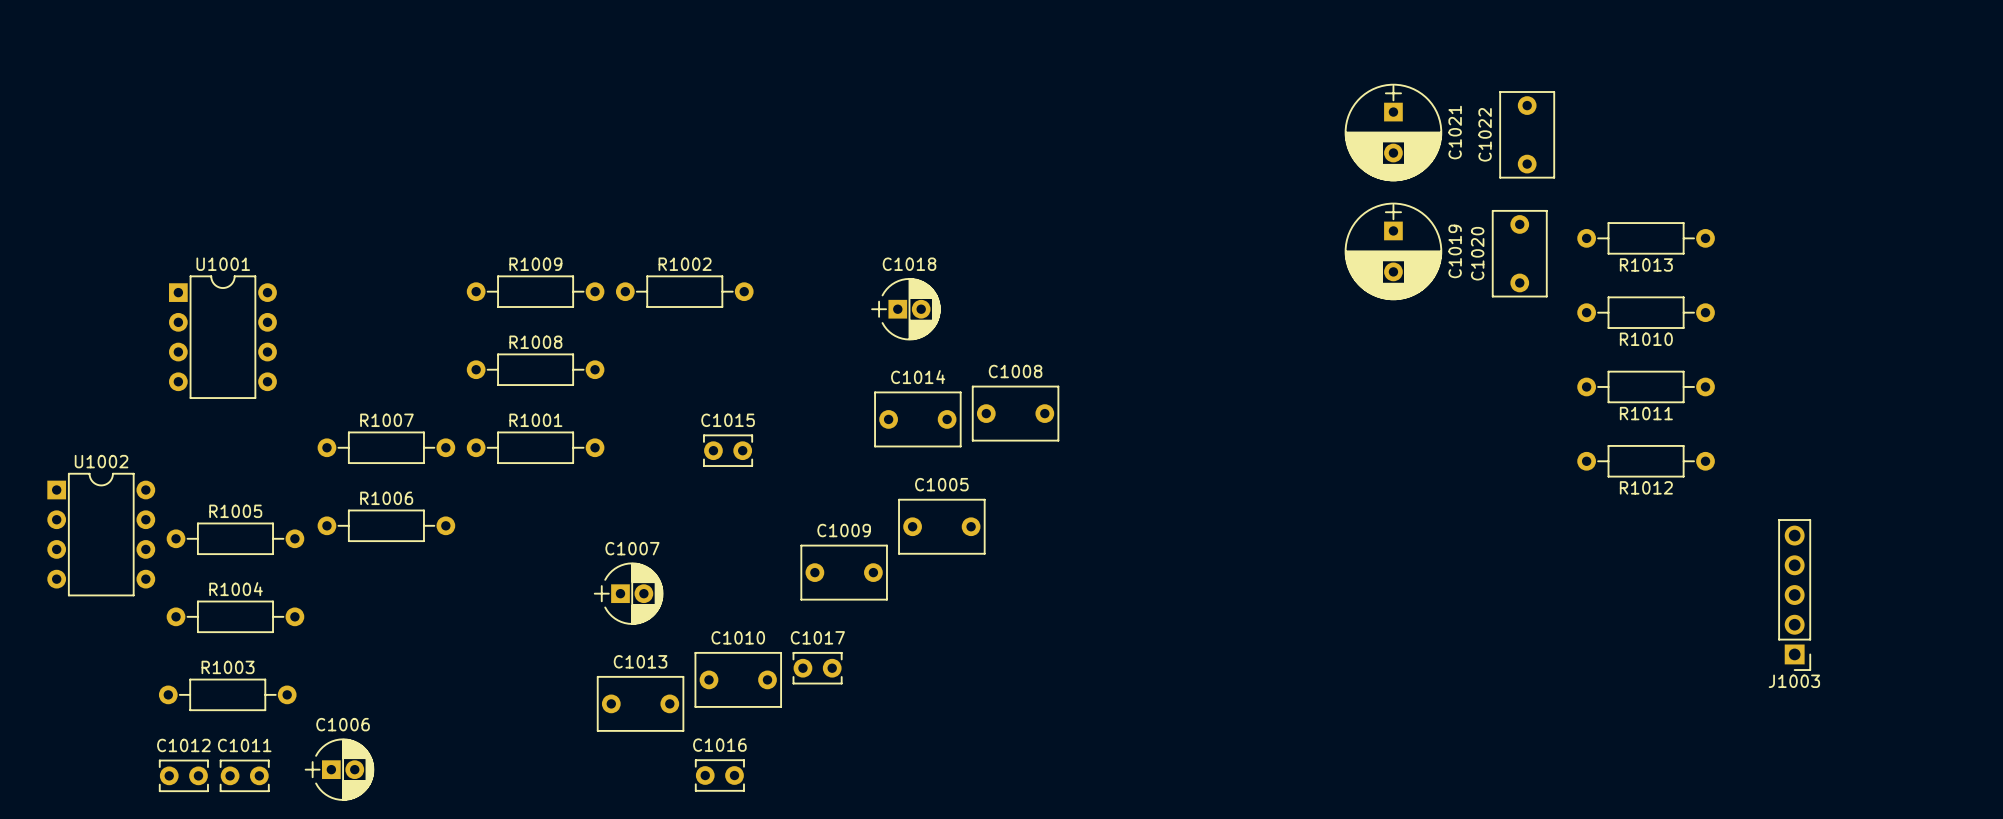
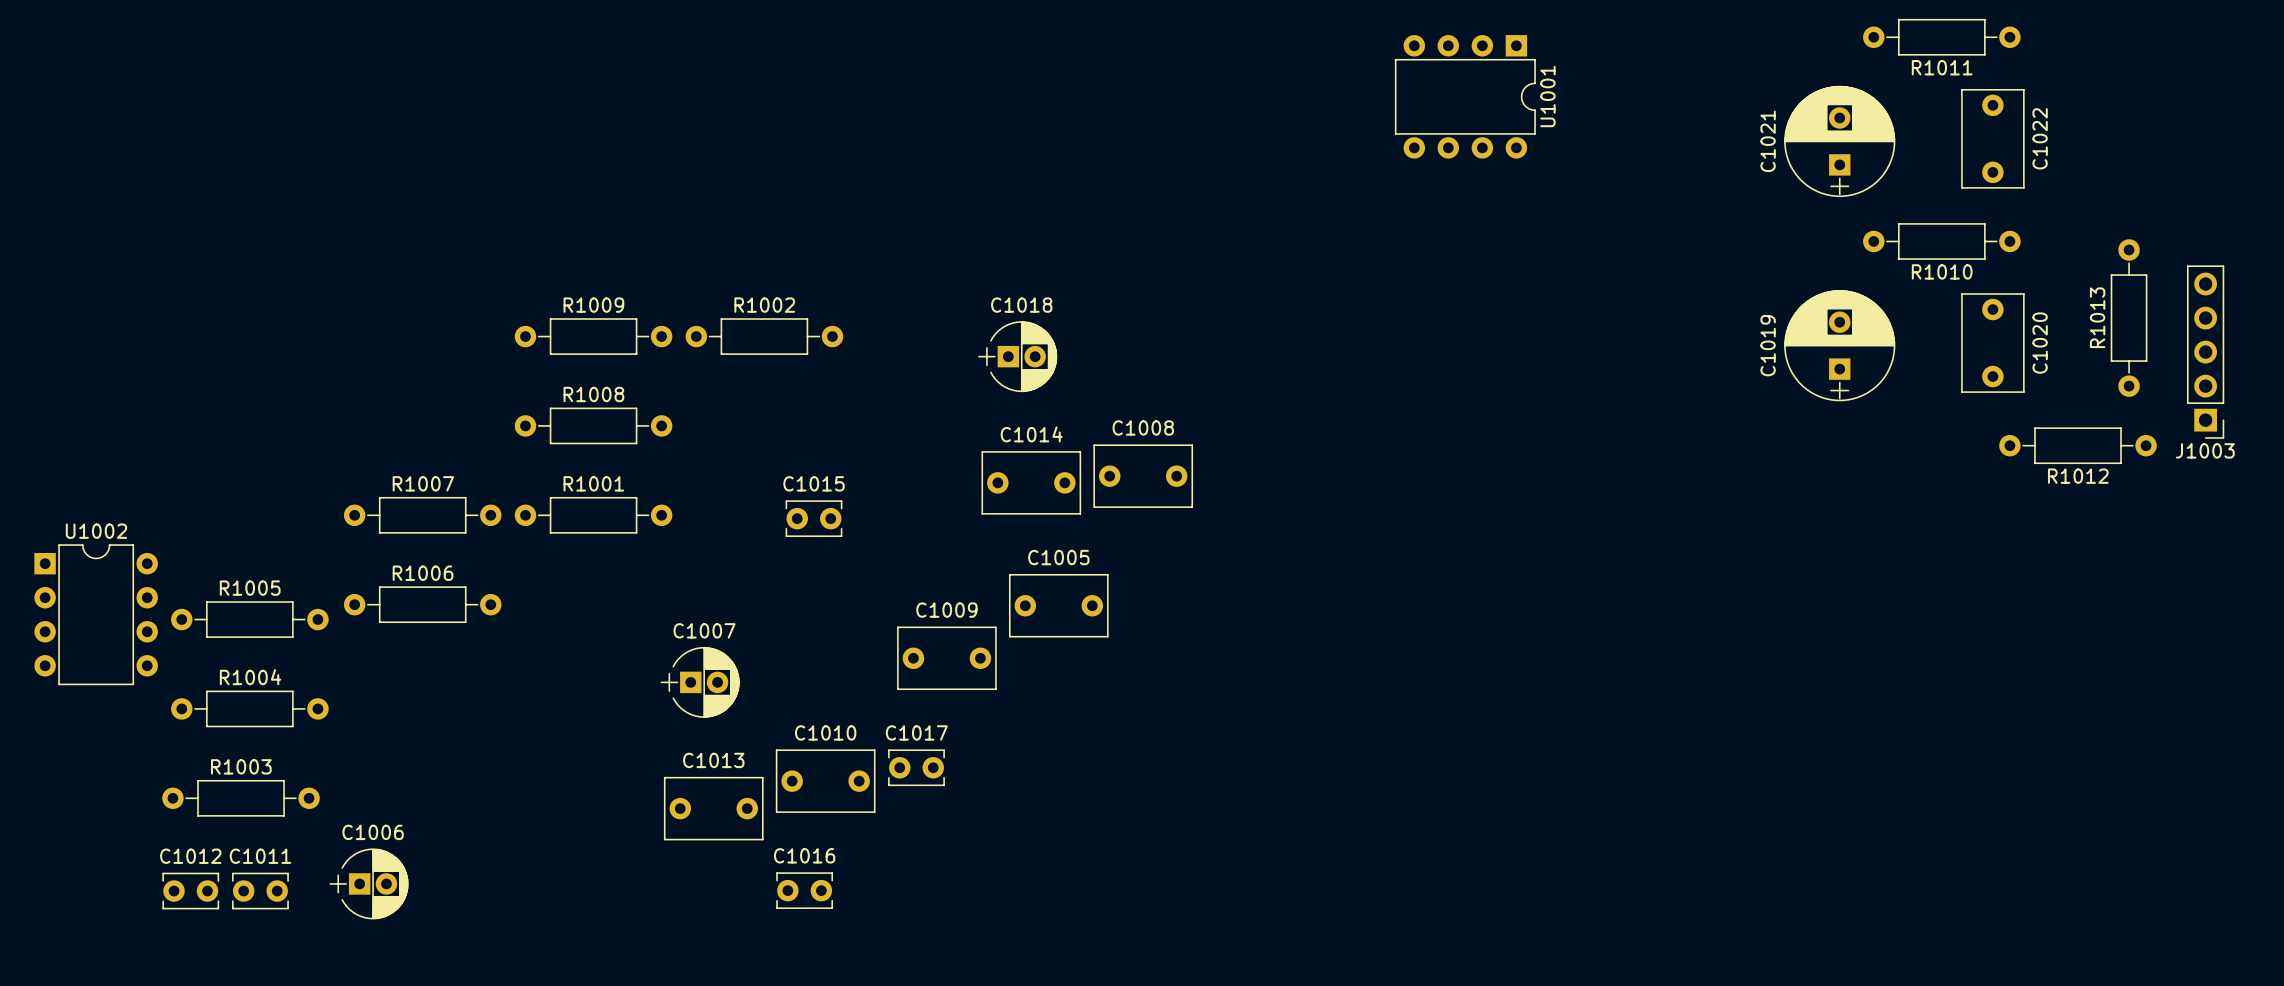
C1021 rotation: 0° (1393, 132) -> 180° (1839, 141)
C1021 position: (1393, 132) -> (1839, 141)
C1022 name position: C1022 (1485, 134) -> C1022 (2040, 138)
C1022 position: (1527, 134) -> (1992, 138)
R1013 rotation: 0° (1646, 238) -> 90° clockwise (2129, 318)
R1013 position: (1646, 238) -> (2129, 318)
C1019 rotation: 0° (1393, 251) -> 180° (1839, 345)
C1019 position: (1393, 251) -> (1839, 345)
C1020 name position: C1020 (1477, 253) -> C1020 (2040, 343)
C1020 position: (1519, 253) -> (1992, 343)
R1010 position: (1646, 312) -> (1941, 241)
U1001 rotation: 0° (222, 337) -> 90° clockwise (1465, 96)
U1001 position: (222, 337) -> (1465, 96)
R1011 position: (1646, 386) -> (1941, 37)
R1012 position: (1646, 461) -> (2077, 445)
J1003 position: (1794, 595) -> (2205, 352)

